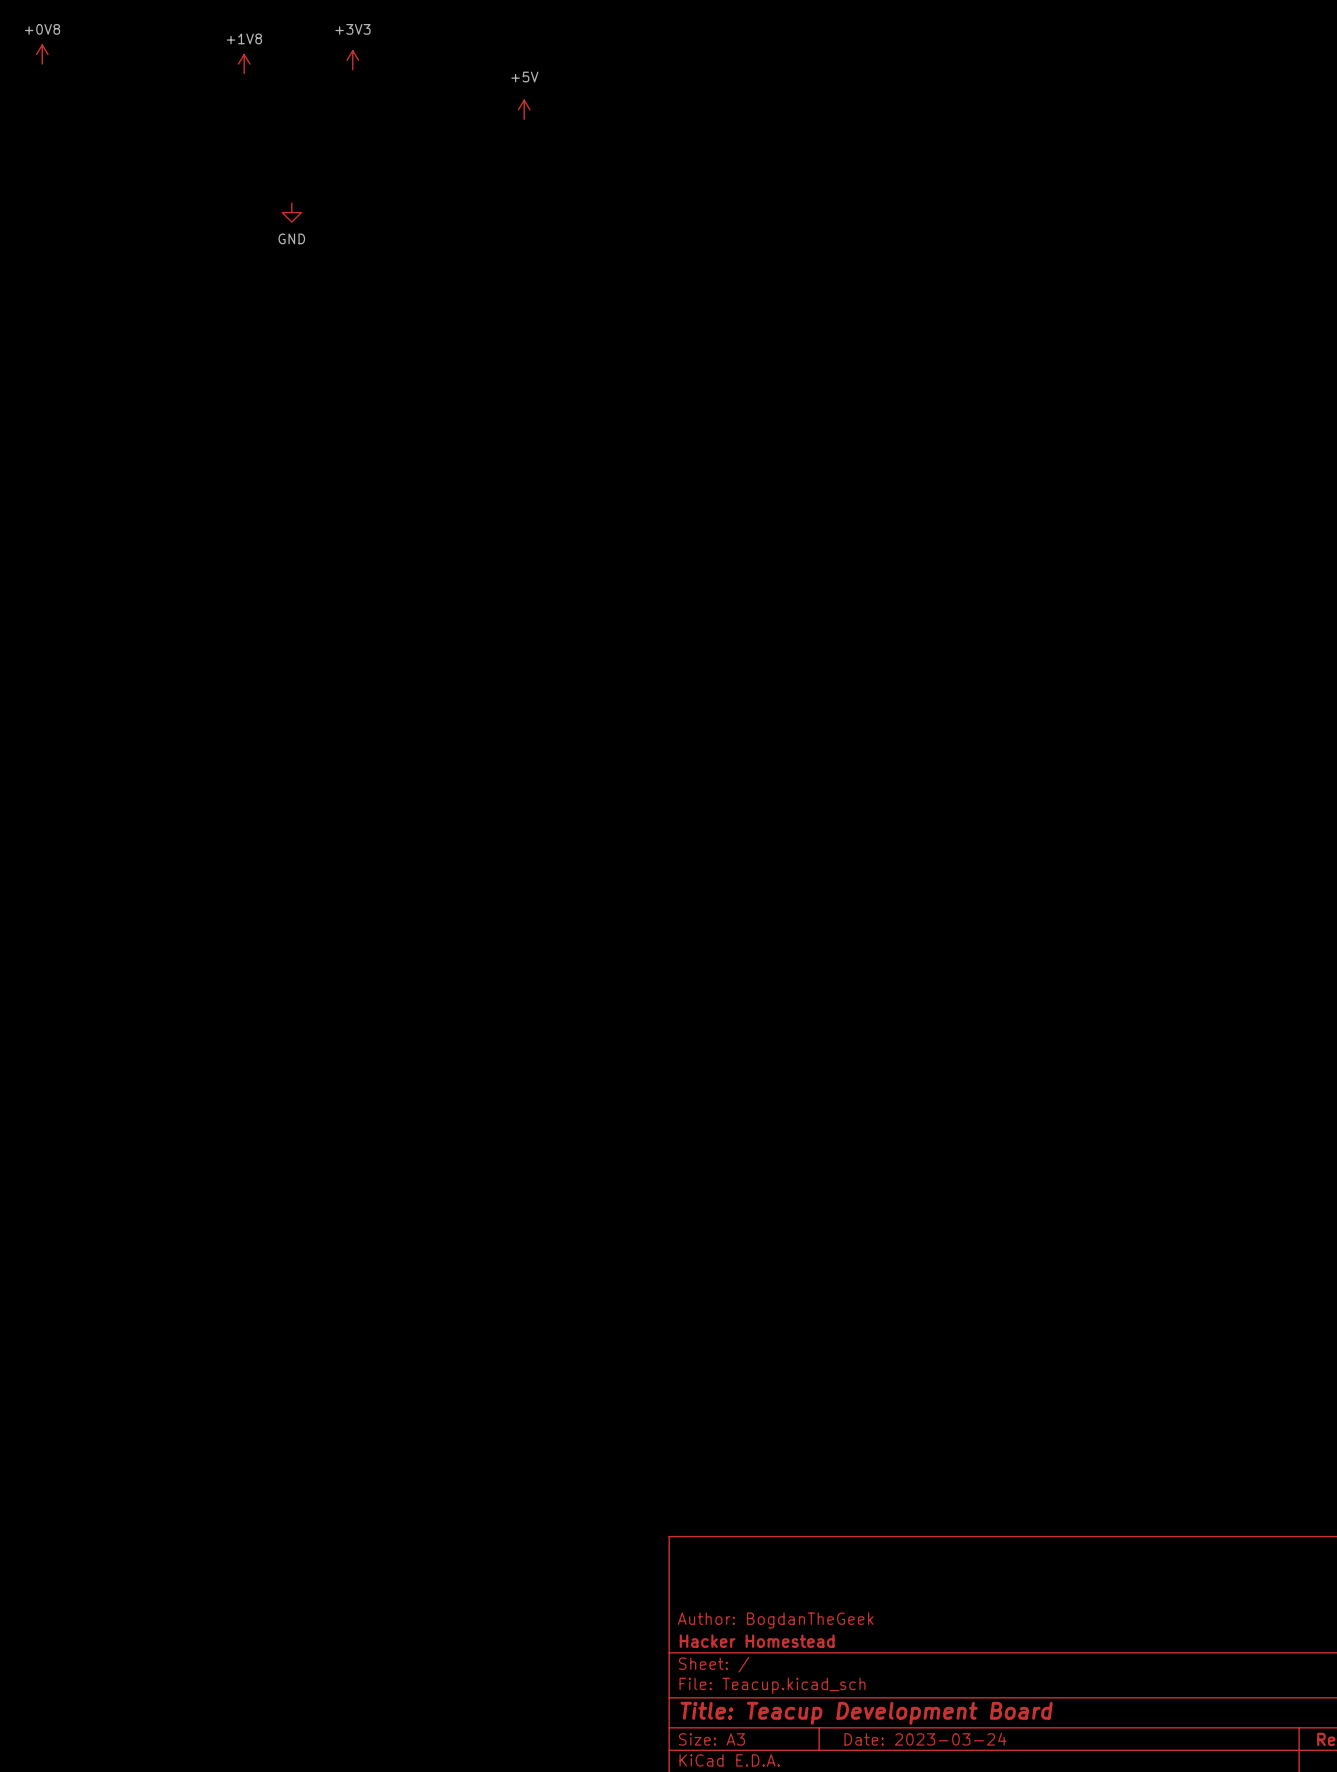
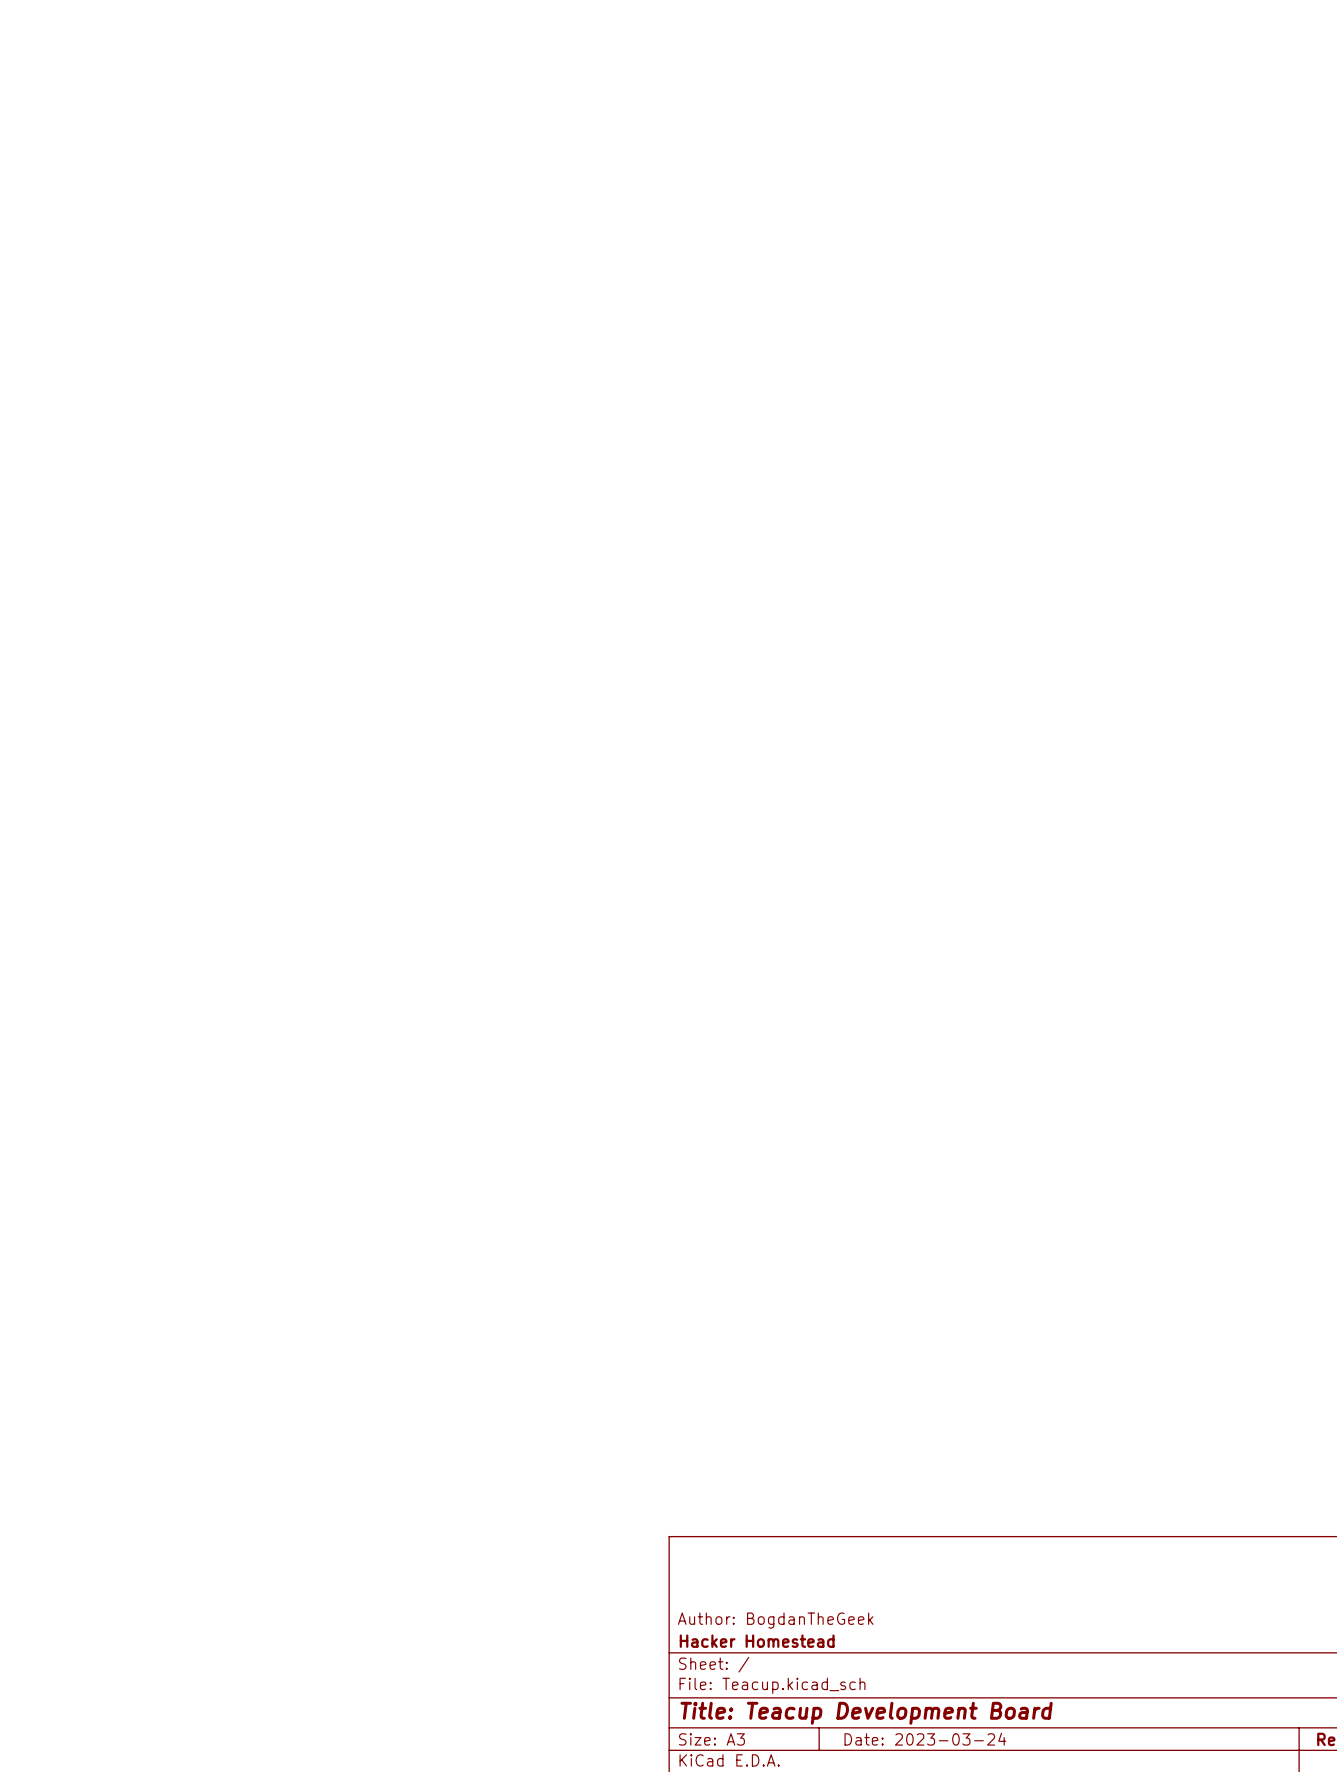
power symbol: +0V8 (42, 54) -> none
power symbol: +3V3 (352, 60) -> none
power symbol: +1V8 (244, 64) -> none
power symbol: +5V (524, 109) -> none
power symbol: GND (291, 212) -> none

